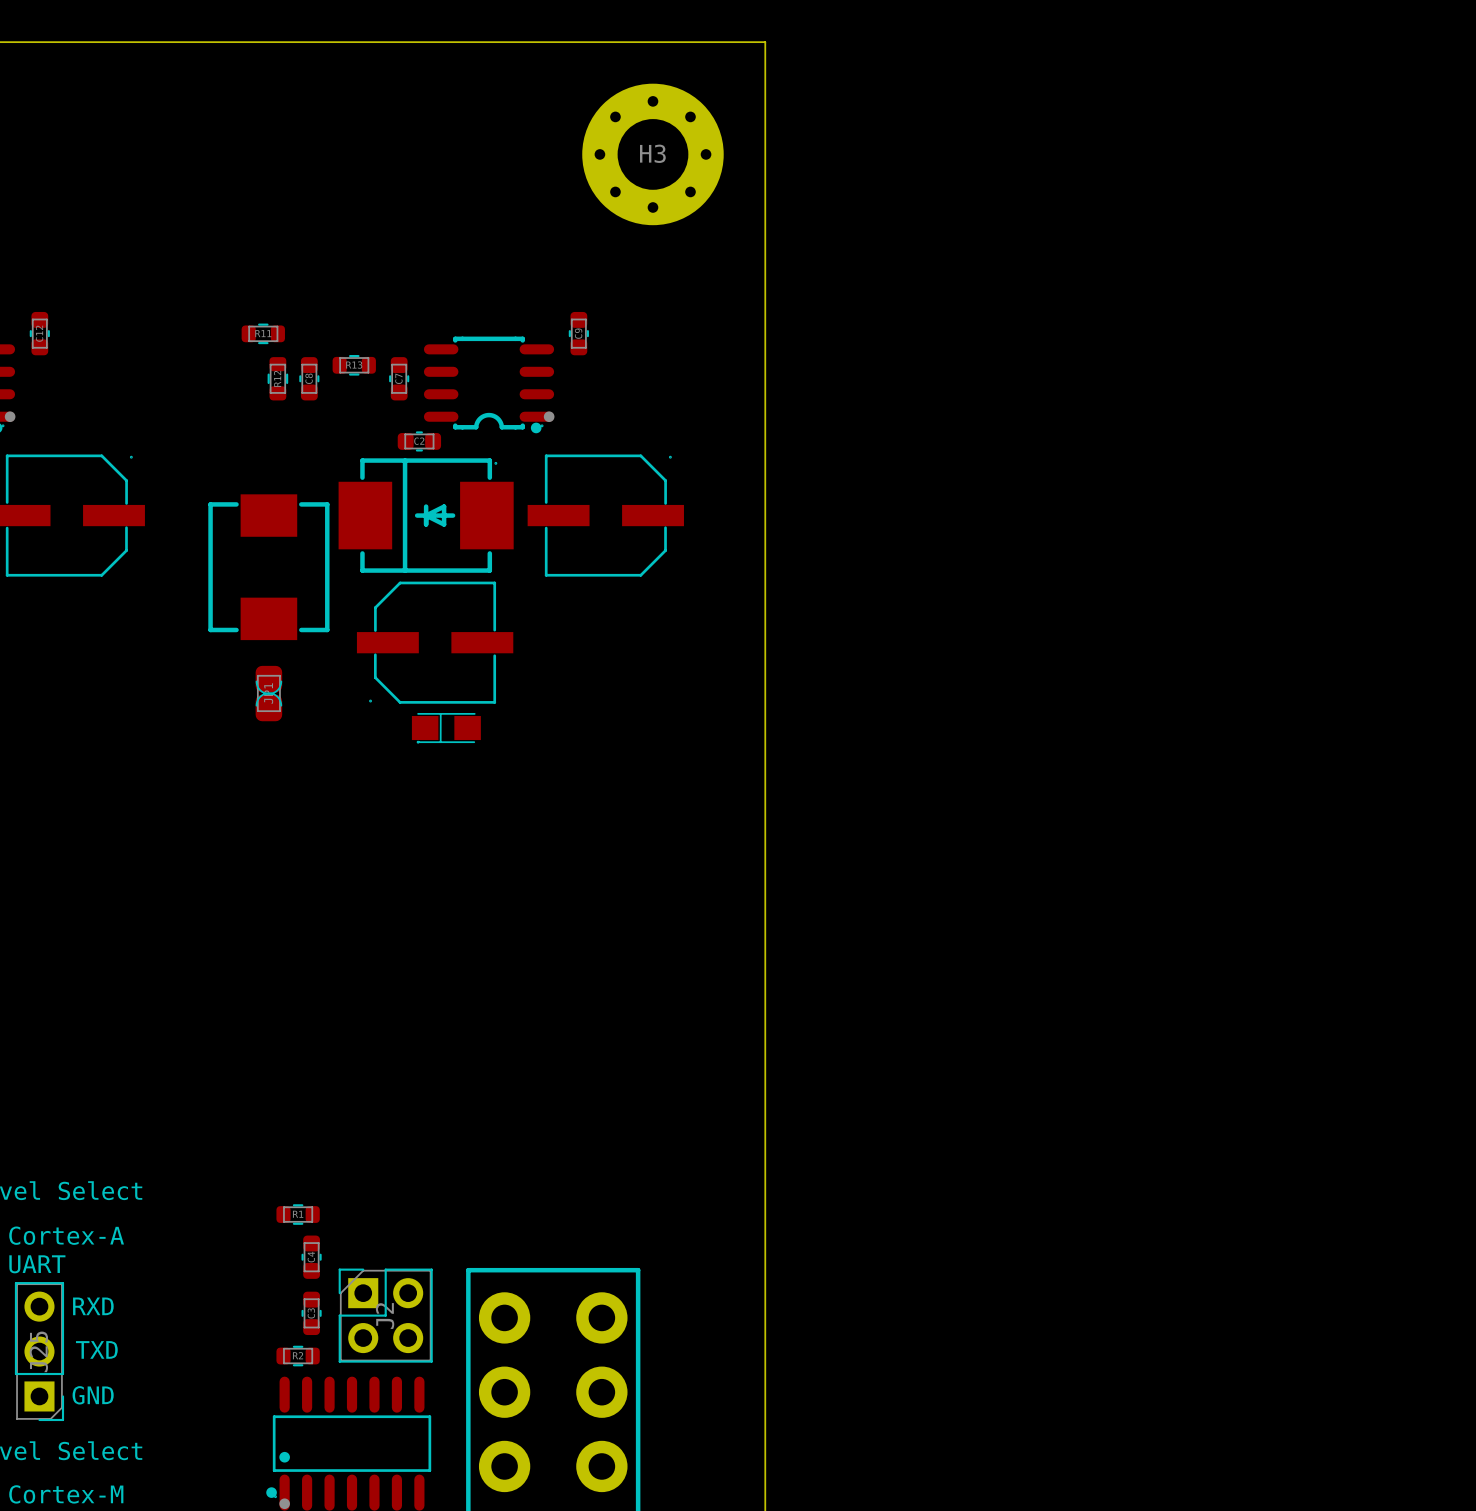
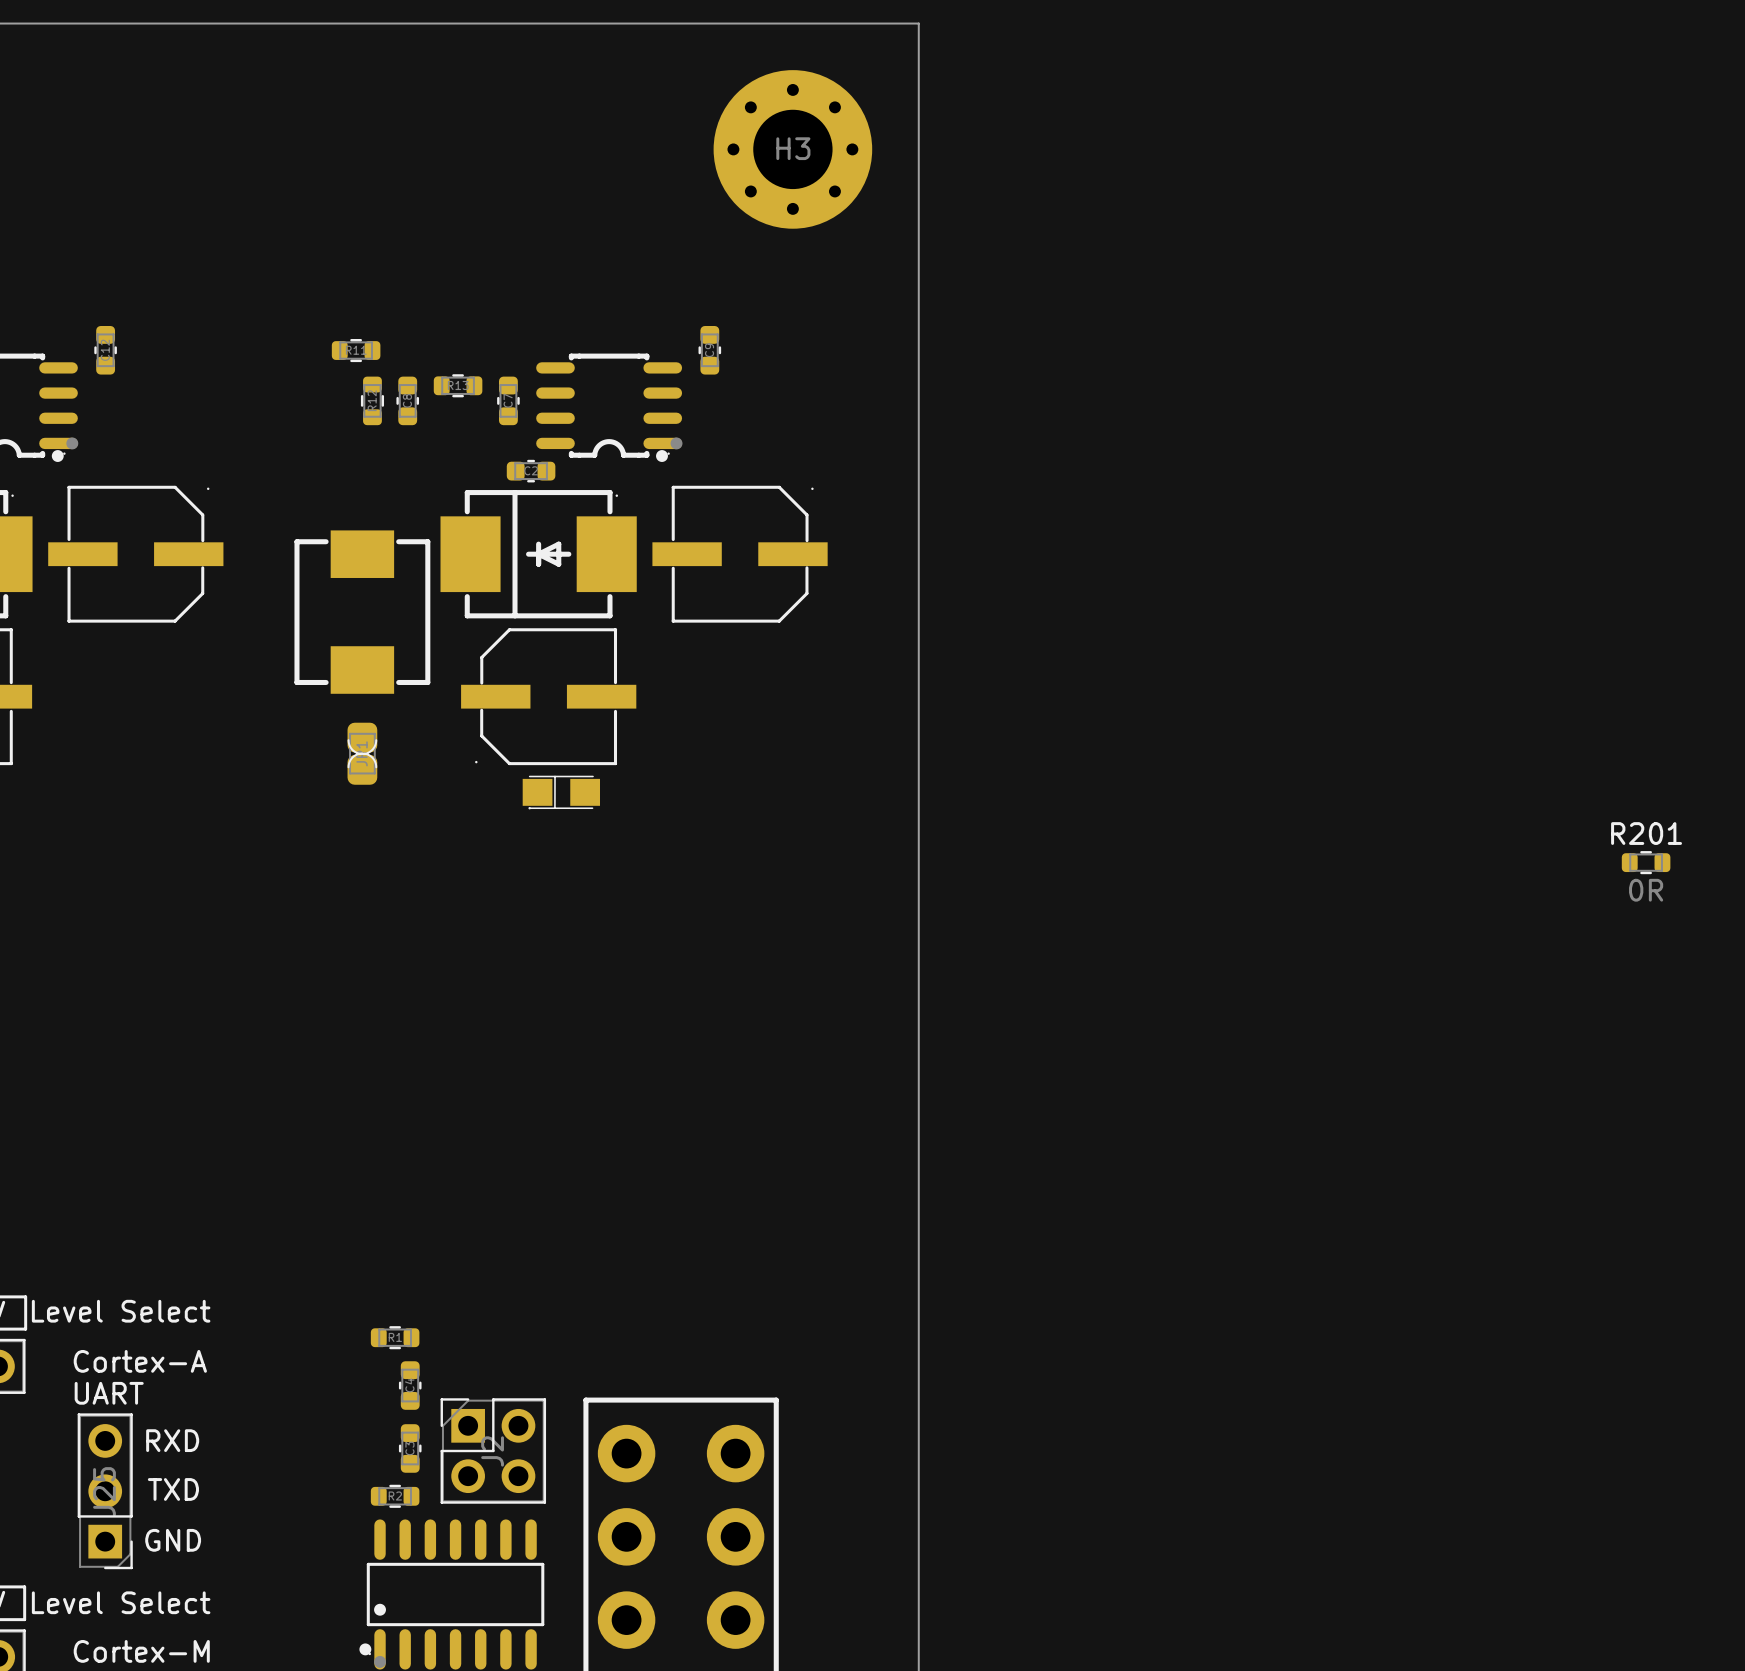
R201: none -> 0R (1646, 862)

